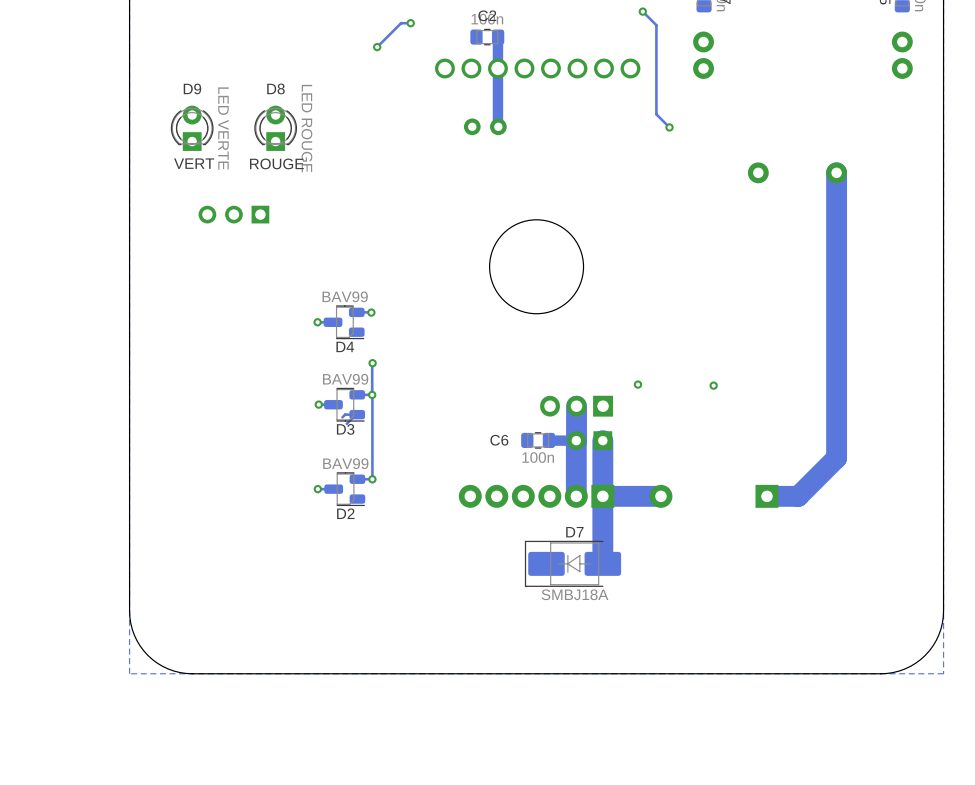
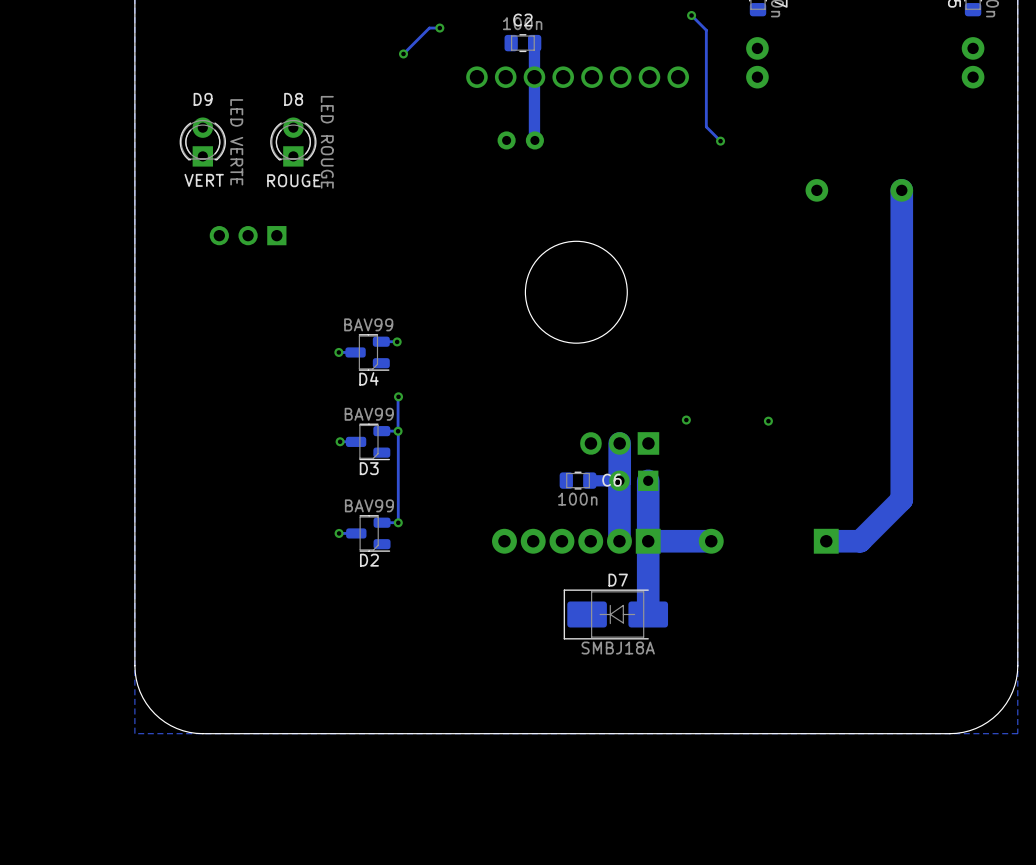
track: (356, 414) (346, 423) -> none
track: (357, 414) (345, 414) (342, 417) -> none
C6 name position: C6 (499, 440) -> C6 (612, 480)

